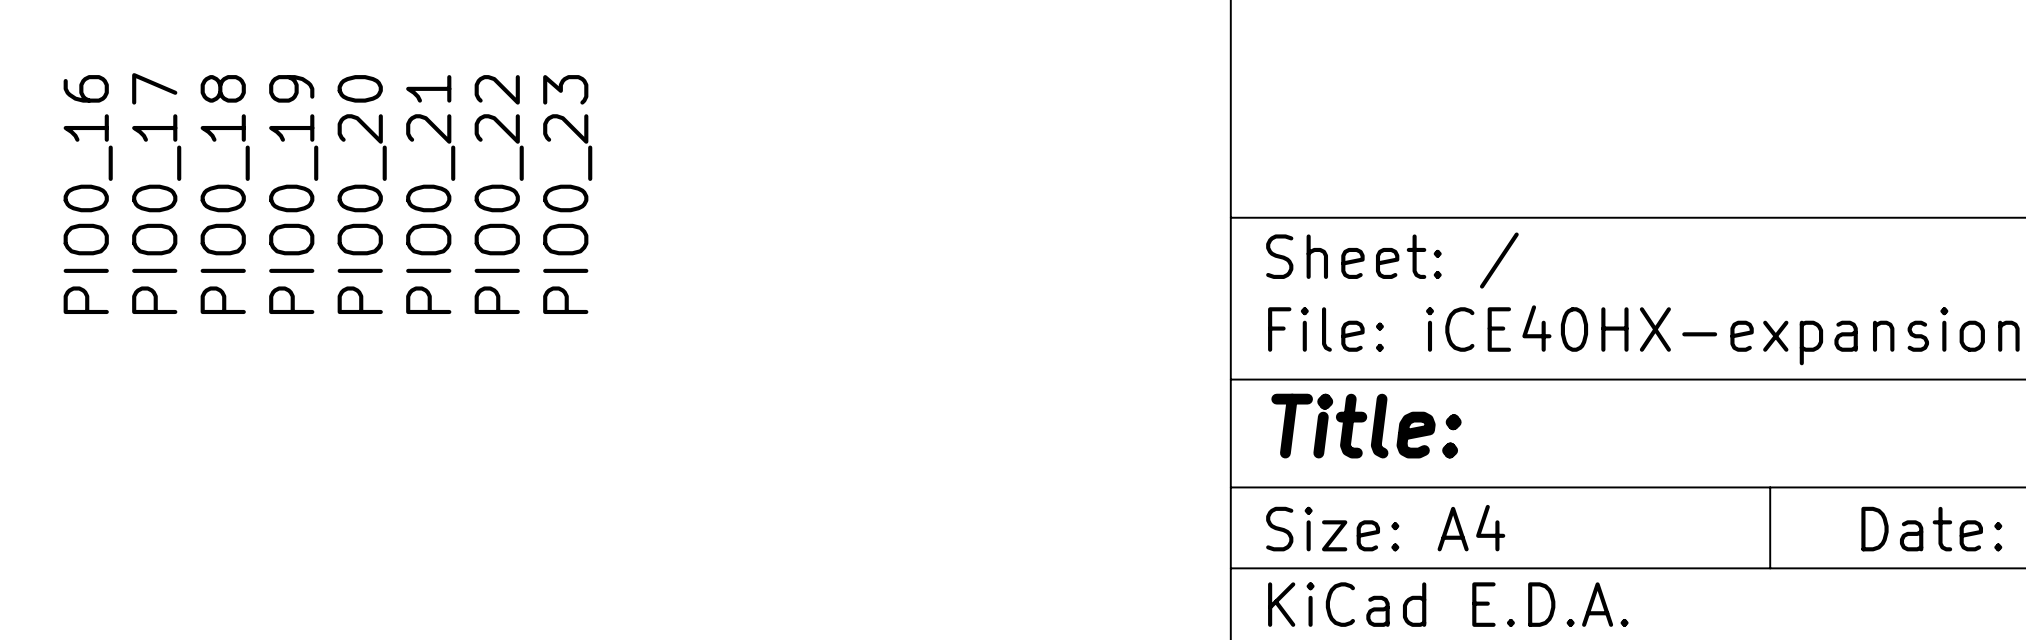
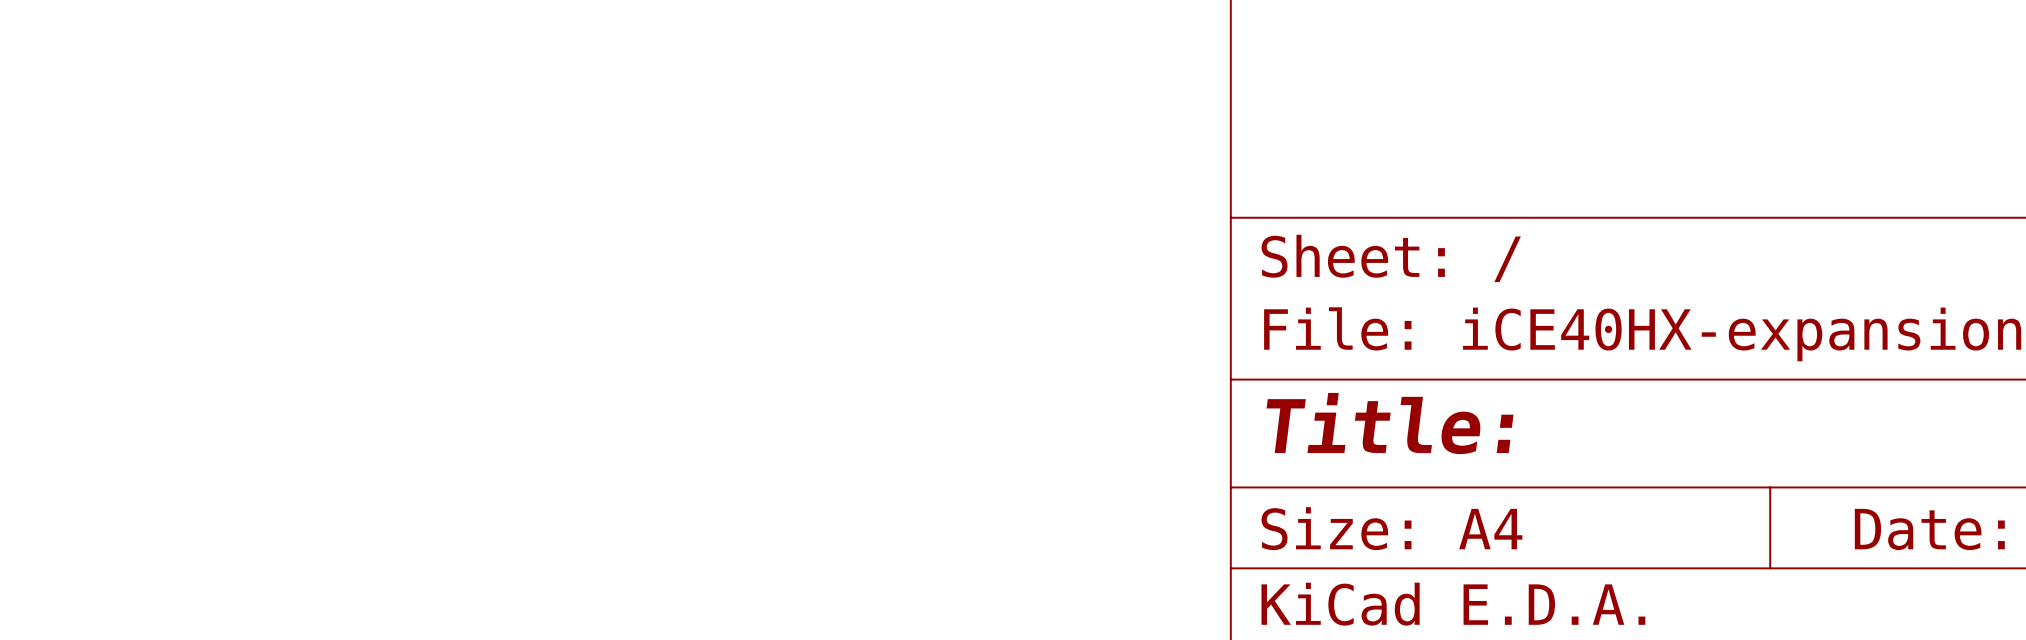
label: PIO0_17 (156, 193) -> none
label: PIO0_16 (88, 194) -> none
label: PIO0_18 (225, 194) -> none
label: PIO0_19 (293, 194) -> none
label: PIO0_20 (362, 194) -> none
label: PIO0_21 (430, 194) -> none
label: PIO0_22 (499, 194) -> none
label: PIO0_23 (567, 194) -> none

